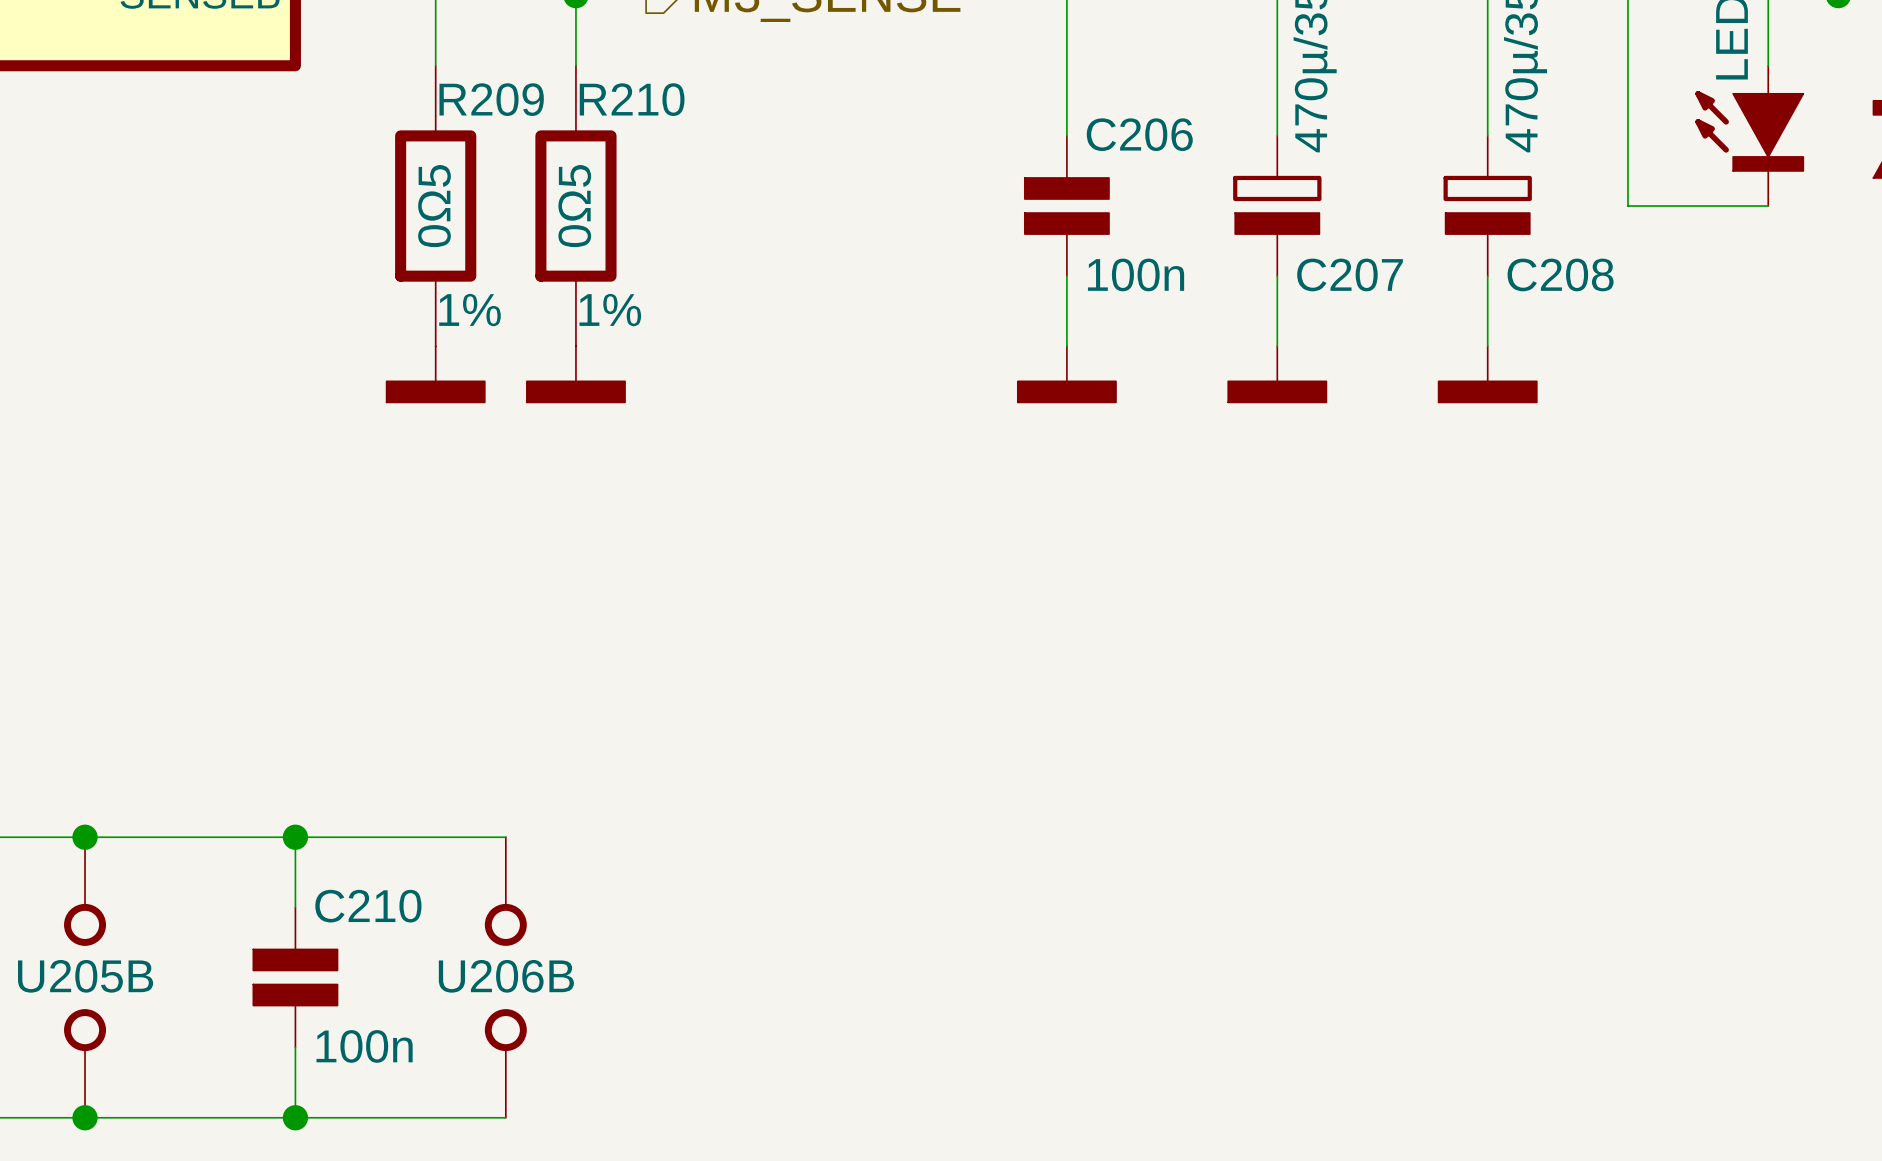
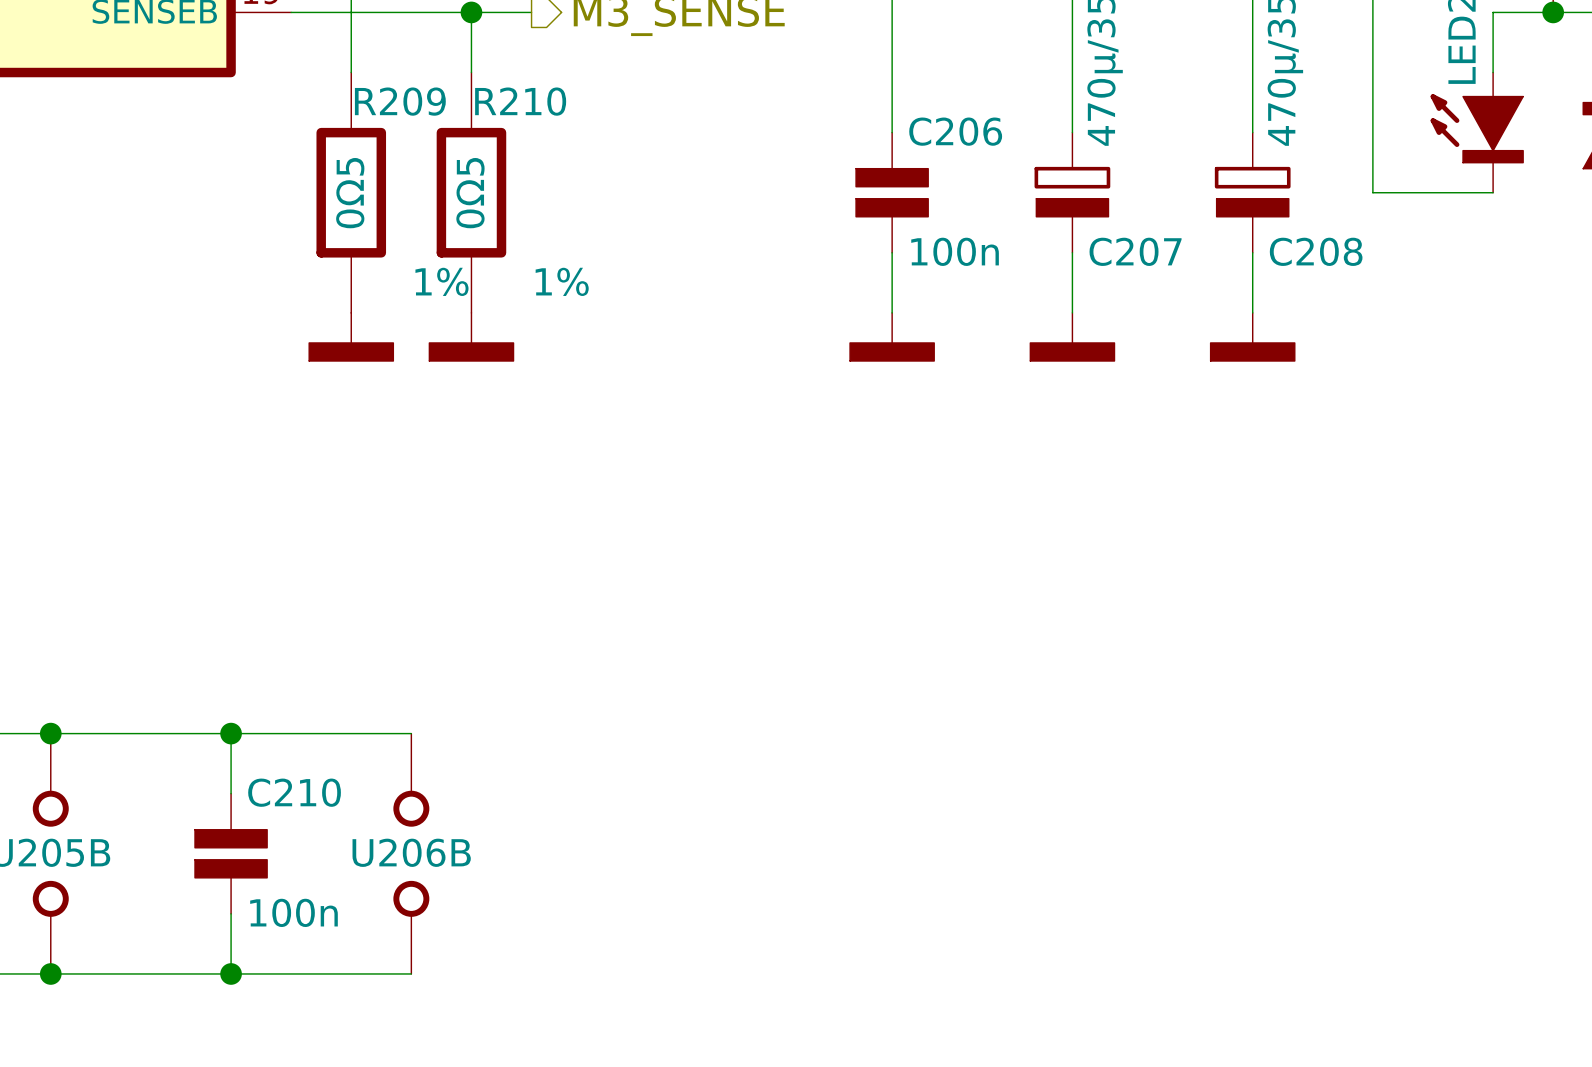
R209 text position: 1% (469, 310) -> 1% (441, 281)
R210 text position: 1% (610, 310) -> 1% (562, 281)

